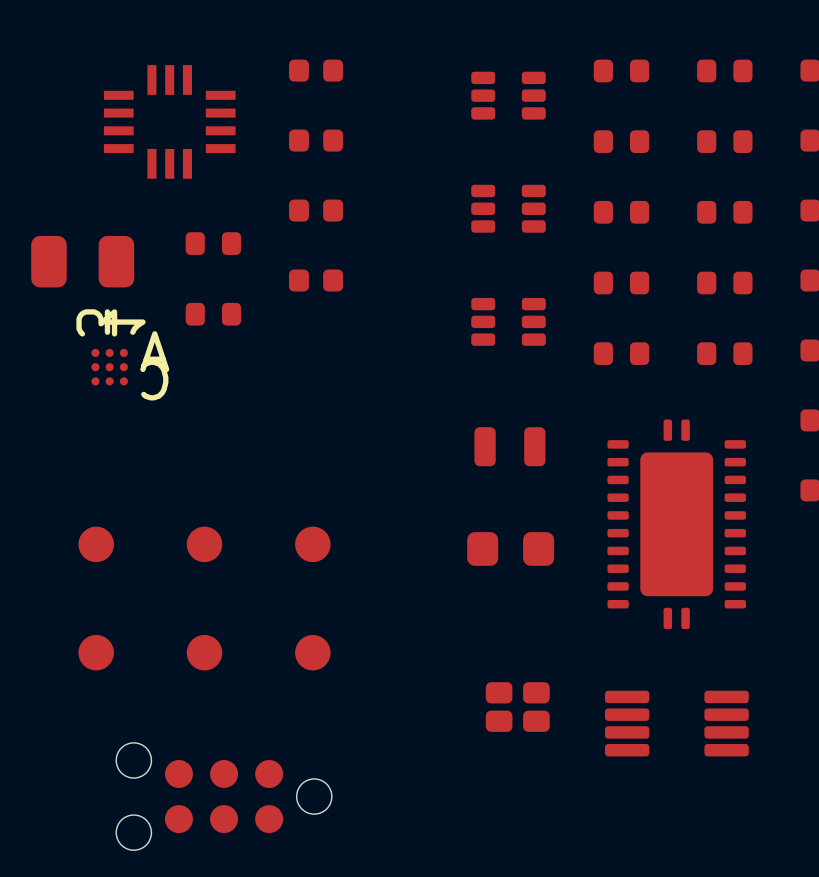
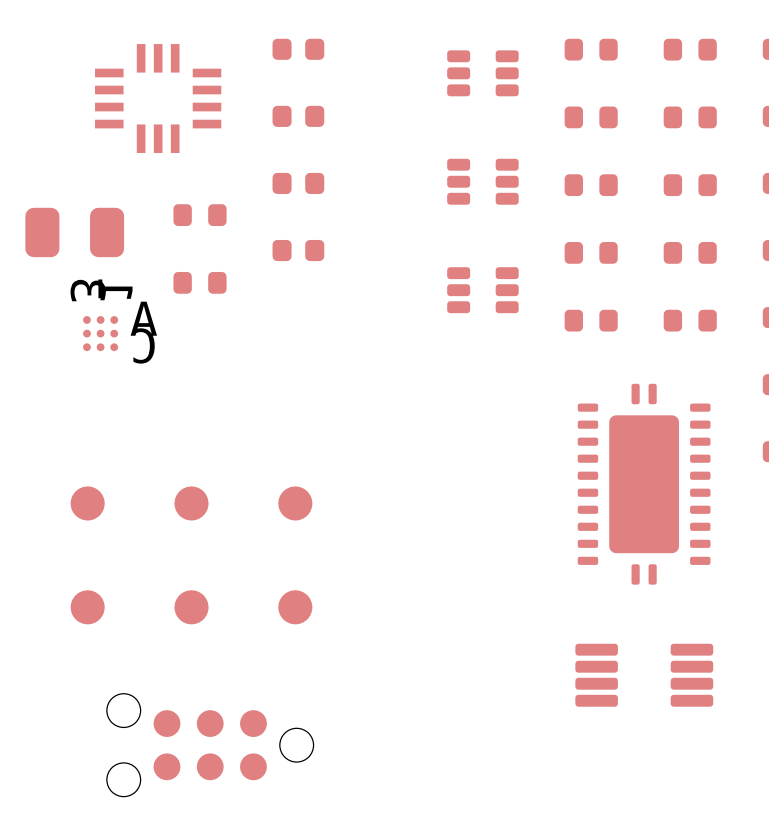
part: (509, 446) -> none
part: (510, 548) -> none
part: (517, 707) -> none

